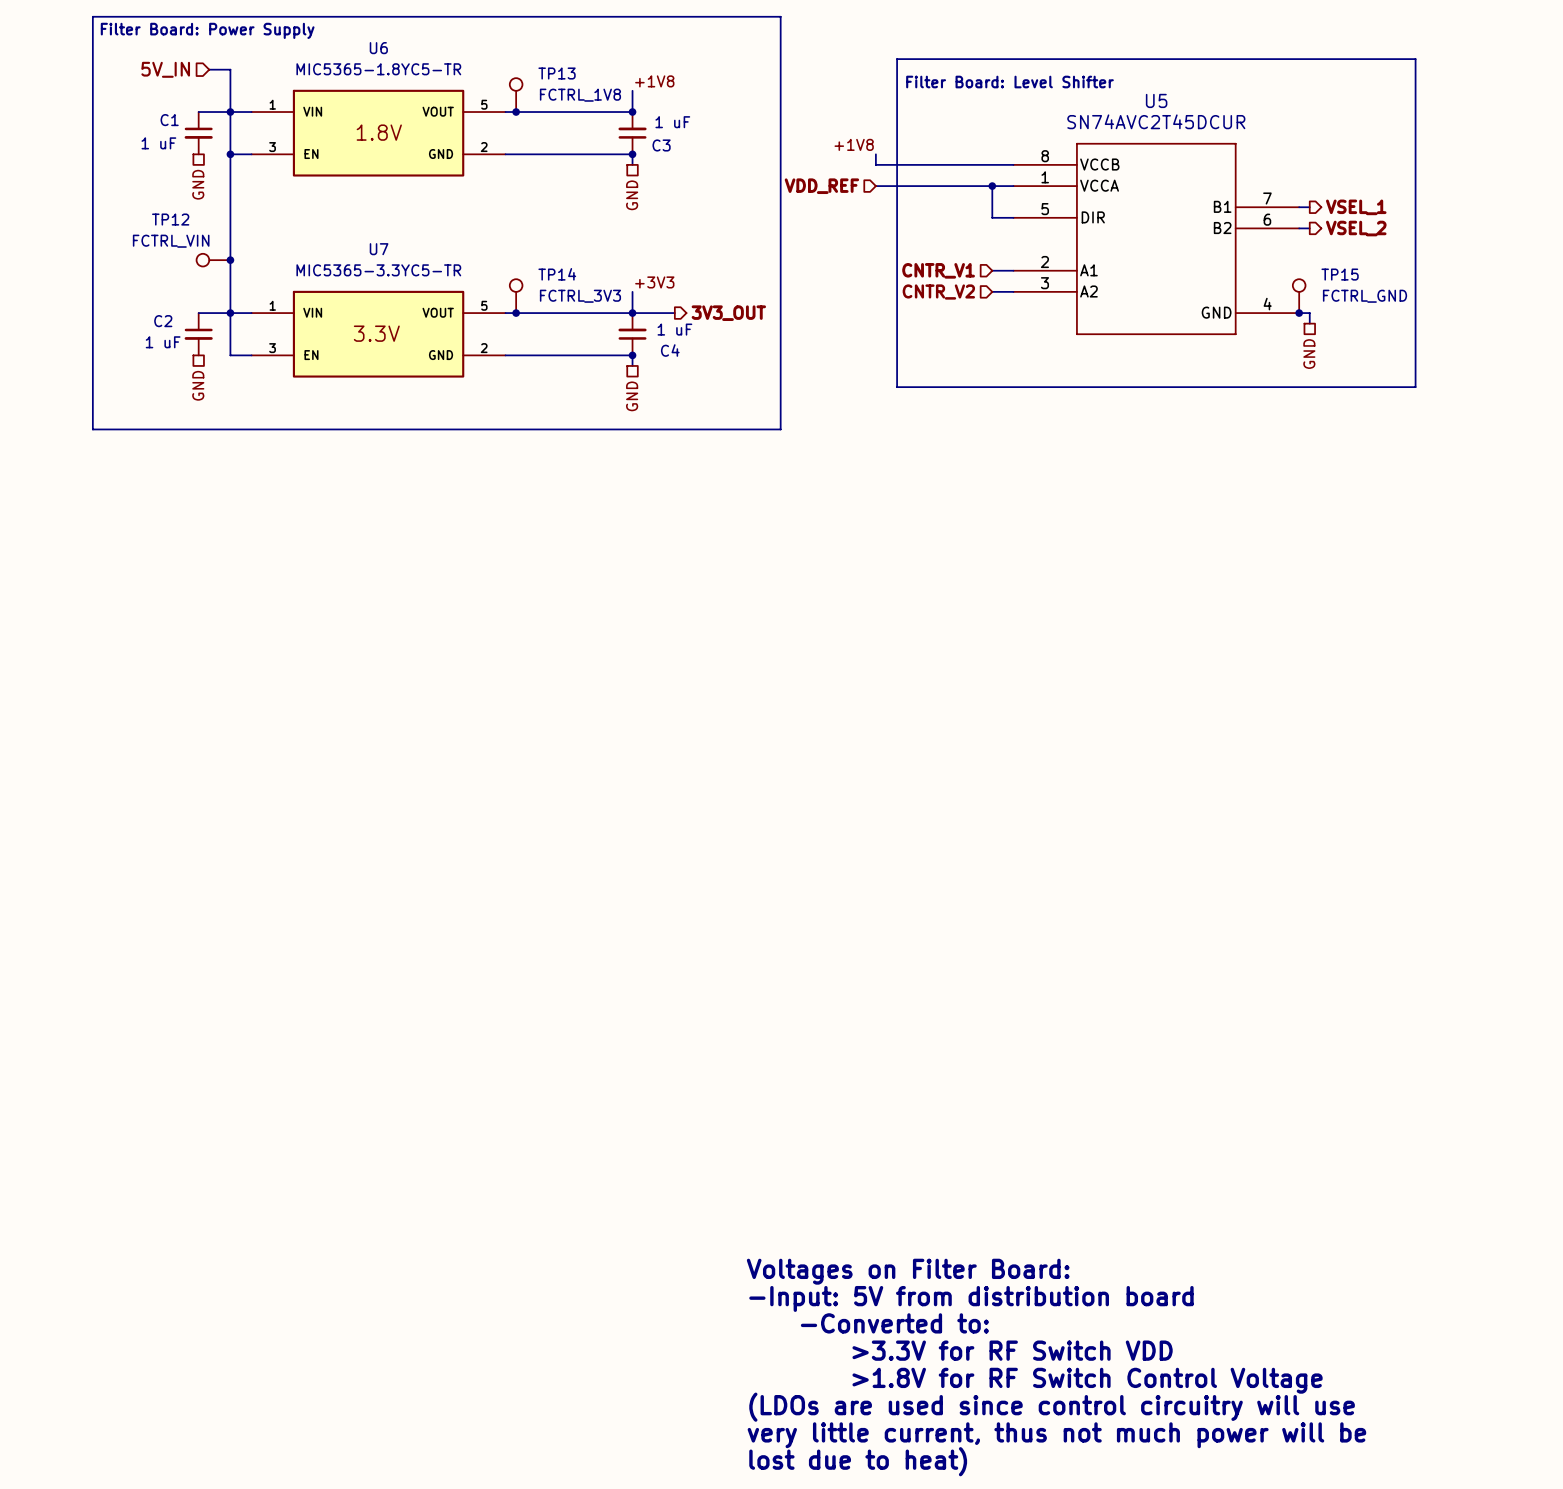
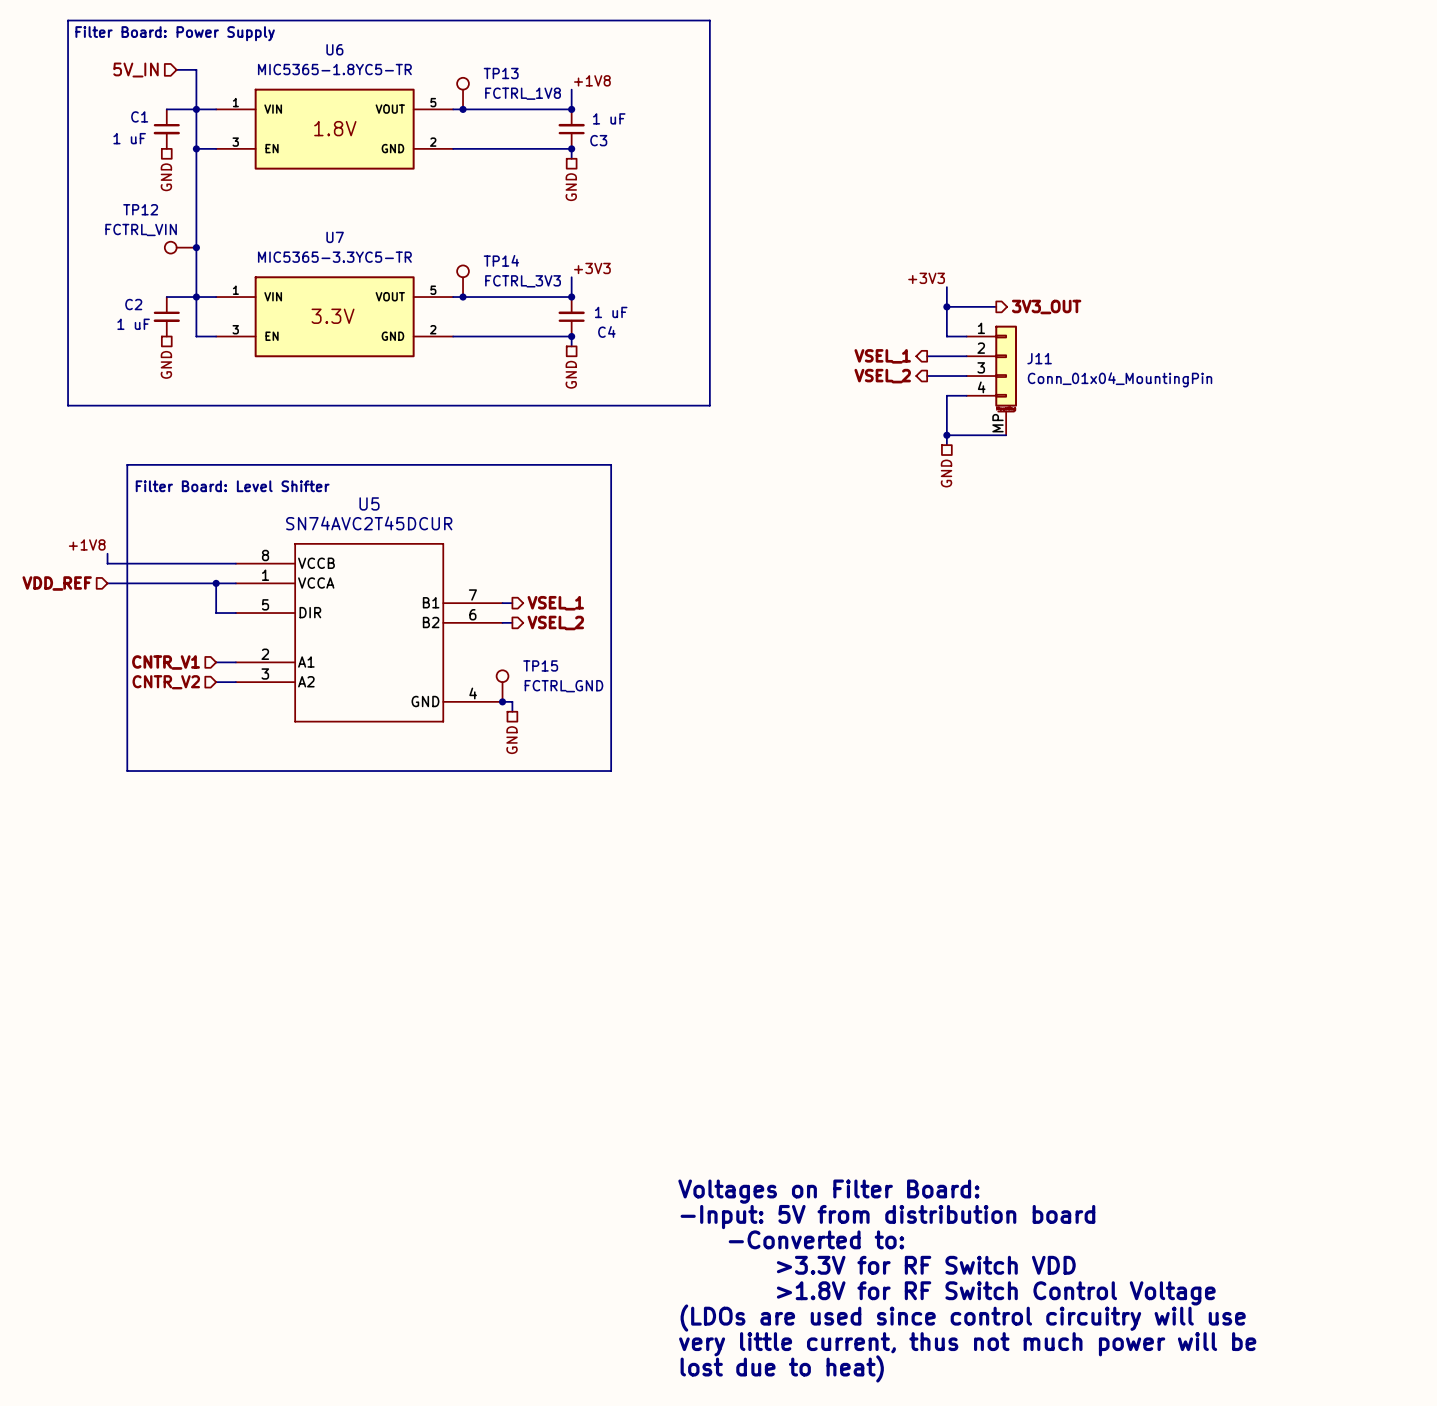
line: (897, 59) (1415, 59) (1415, 387) (897, 387) (897, 59) -> none
text: Filter Board: Level Shifter (1009, 82) -> none
label: +1V8 (854, 144) -> none
wire: (875, 154) (875, 164) (1013, 164) -> none
hierarchical label: VDD_REF (821, 186) -> none
wire: (875, 186) (1013, 186) -> none
wire: (992, 186) (992, 217) (1013, 217) -> none
junction: (992, 186) -> none
wire: (1299, 207) (1309, 207) -> none
hierarchical label: VSEL_1 (1356, 207) -> none
wire: (1299, 228) (1309, 228) -> none
hierarchical label: VSEL_2 (1356, 228) -> none
U5 position: (1156, 238) -> (369, 632)
hierarchical label: CNTR_V1 (938, 270) -> none
wire: (992, 270) (1013, 270) -> none
wire: (992, 291) (1013, 291) -> none
hierarchical label: CNTR_V2 (938, 292) -> none
label: none -> +3V3 (926, 278)
TP15 position: (1299, 296) -> (502, 686)
wire: none -> (946, 287) (946, 336) (966, 336)
wire: (632, 313) (674, 313) -> none
hierarchical label: 3V3_OUT (728, 313) -> none
wire: (1299, 313) (1309, 313) (1309, 323) -> none
junction: (1299, 313) -> none
wire: none -> (946, 306) (996, 306)
junction: none -> (946, 306)
hierarchical label: none -> 3V3_OUT (1046, 307)
hierarchical label: GND (1309, 354) -> none
hierarchical label: none -> VSEL_1 (882, 356)
wire: none -> (927, 356) (966, 356)
hierarchical label: none -> VSEL_2 (882, 376)
wire: none -> (927, 376) (966, 376)
J11: none -> Conn_01x04_MountingPin (991, 380)
wire: none -> (966, 395) (946, 395) (946, 445)
wire: none -> (946, 435) (1006, 435)
junction: none -> (946, 435)
line: none -> (127, 464) (611, 464) (611, 771) (127, 771) (127, 464)
hierarchical label: none -> GND (946, 473)
text: none -> Filter Board: Level Shifter (232, 486)
label: none -> +1V8 (87, 544)
wire: none -> (107, 553) (107, 563) (235, 563)
wire: none -> (107, 583) (235, 583)
wire: none -> (216, 583) (216, 613) (235, 613)
junction: none -> (216, 583)
hierarchical label: none -> VDD_REF (57, 583)
wire: none -> (502, 603) (512, 603)
hierarchical label: none -> VSEL_1 (555, 603)
wire: none -> (502, 622) (512, 622)
hierarchical label: none -> VSEL_2 (555, 622)
hierarchical label: none -> CNTR_V1 (166, 662)
wire: none -> (216, 662) (235, 662)
hierarchical label: none -> CNTR_V2 (166, 682)
wire: none -> (216, 682) (235, 682)
wire: none -> (502, 701) (512, 701) (512, 711)
junction: none -> (502, 701)
hierarchical label: none -> GND (512, 740)

